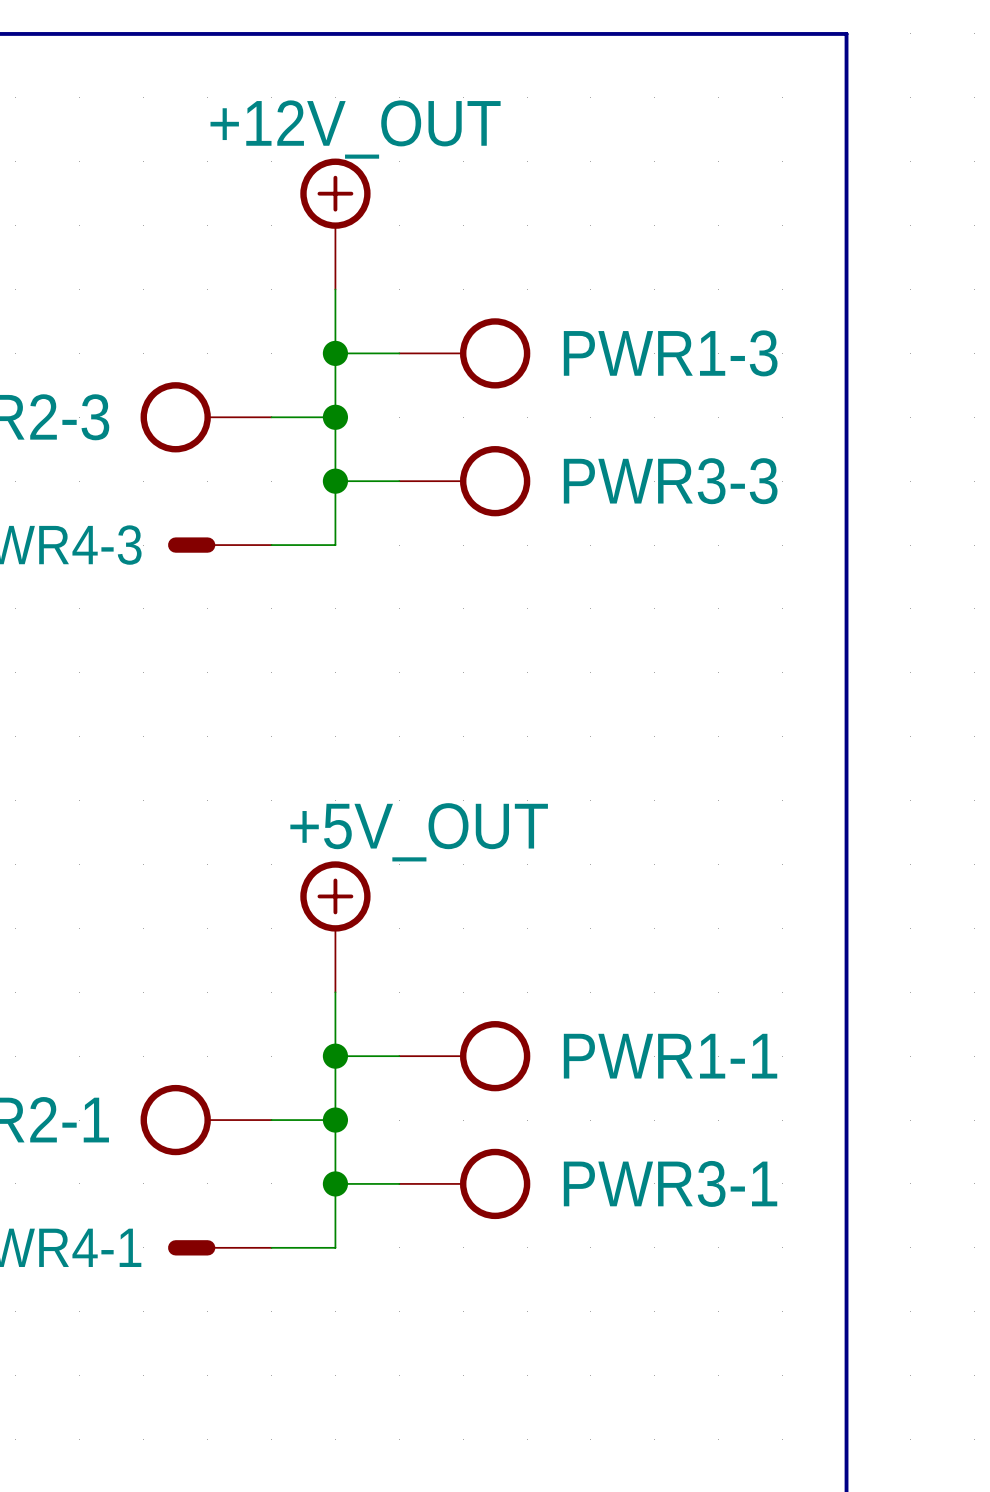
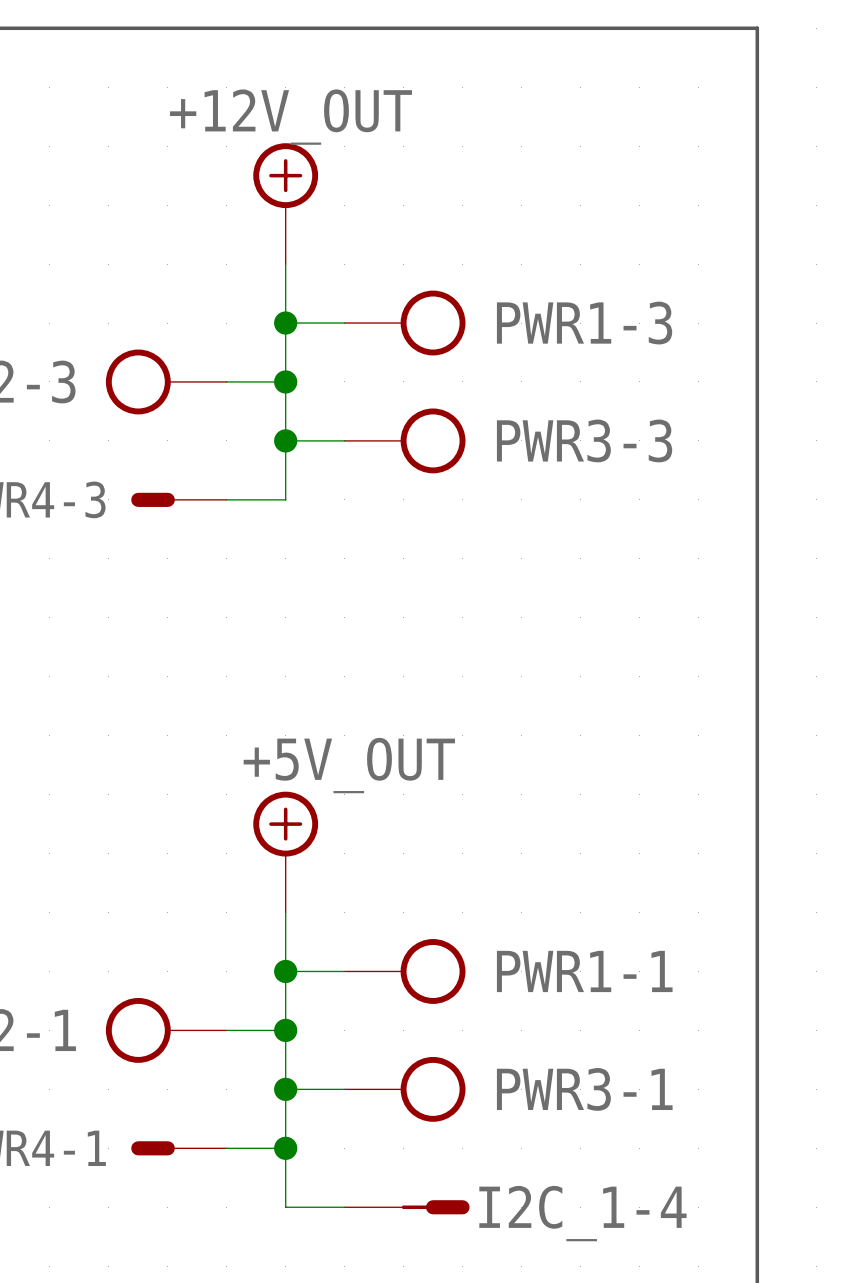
wire: none -> (285, 1148) (285, 1207) (344, 1207)
junction: none -> (285, 1148)
I2C_1-4: none -> (407, 1207)

